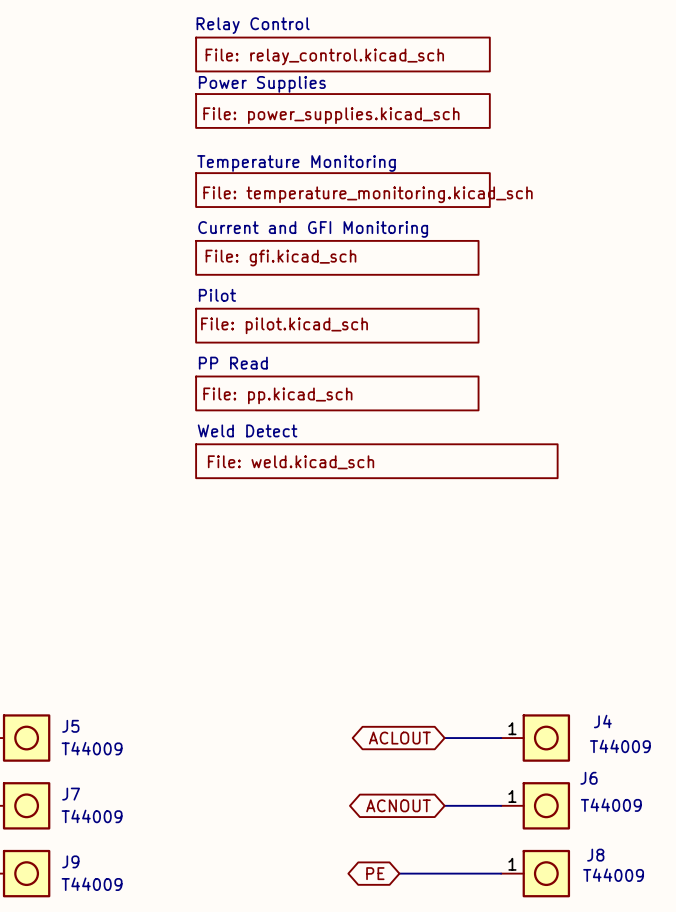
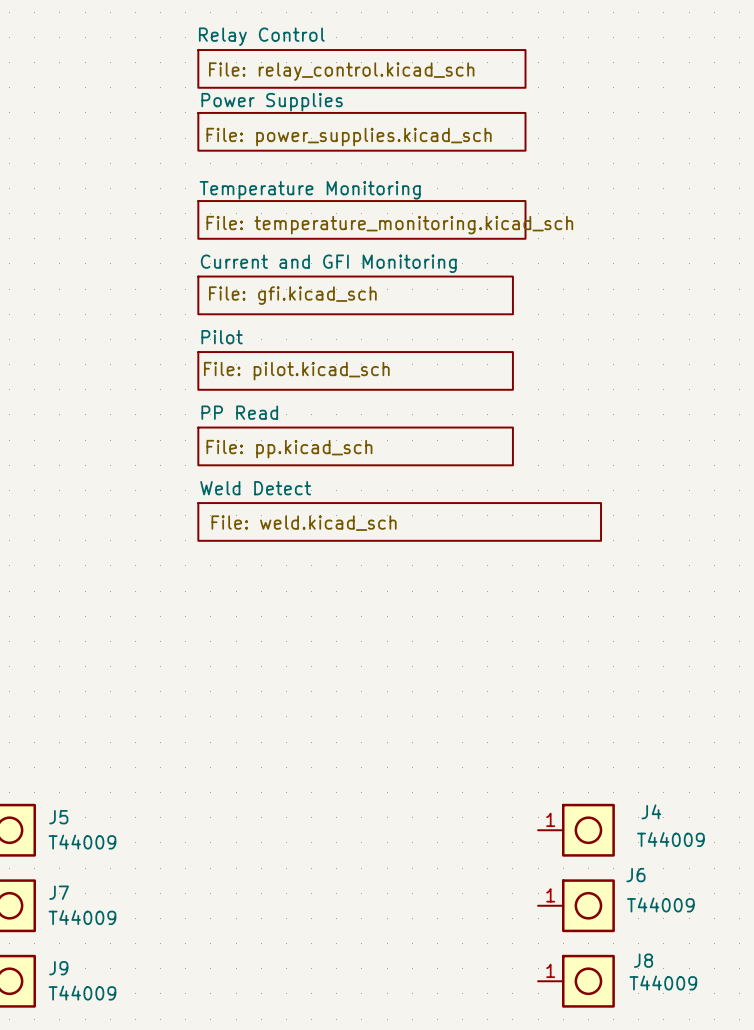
global label: ACLOUT (399, 738) -> none
wire: (444, 738) (501, 738) -> none
global label: ACNOUT (398, 805) -> none
wire: (444, 805) (501, 805) -> none
global label: PE (375, 873) -> none
wire: (399, 873) (501, 873) -> none

